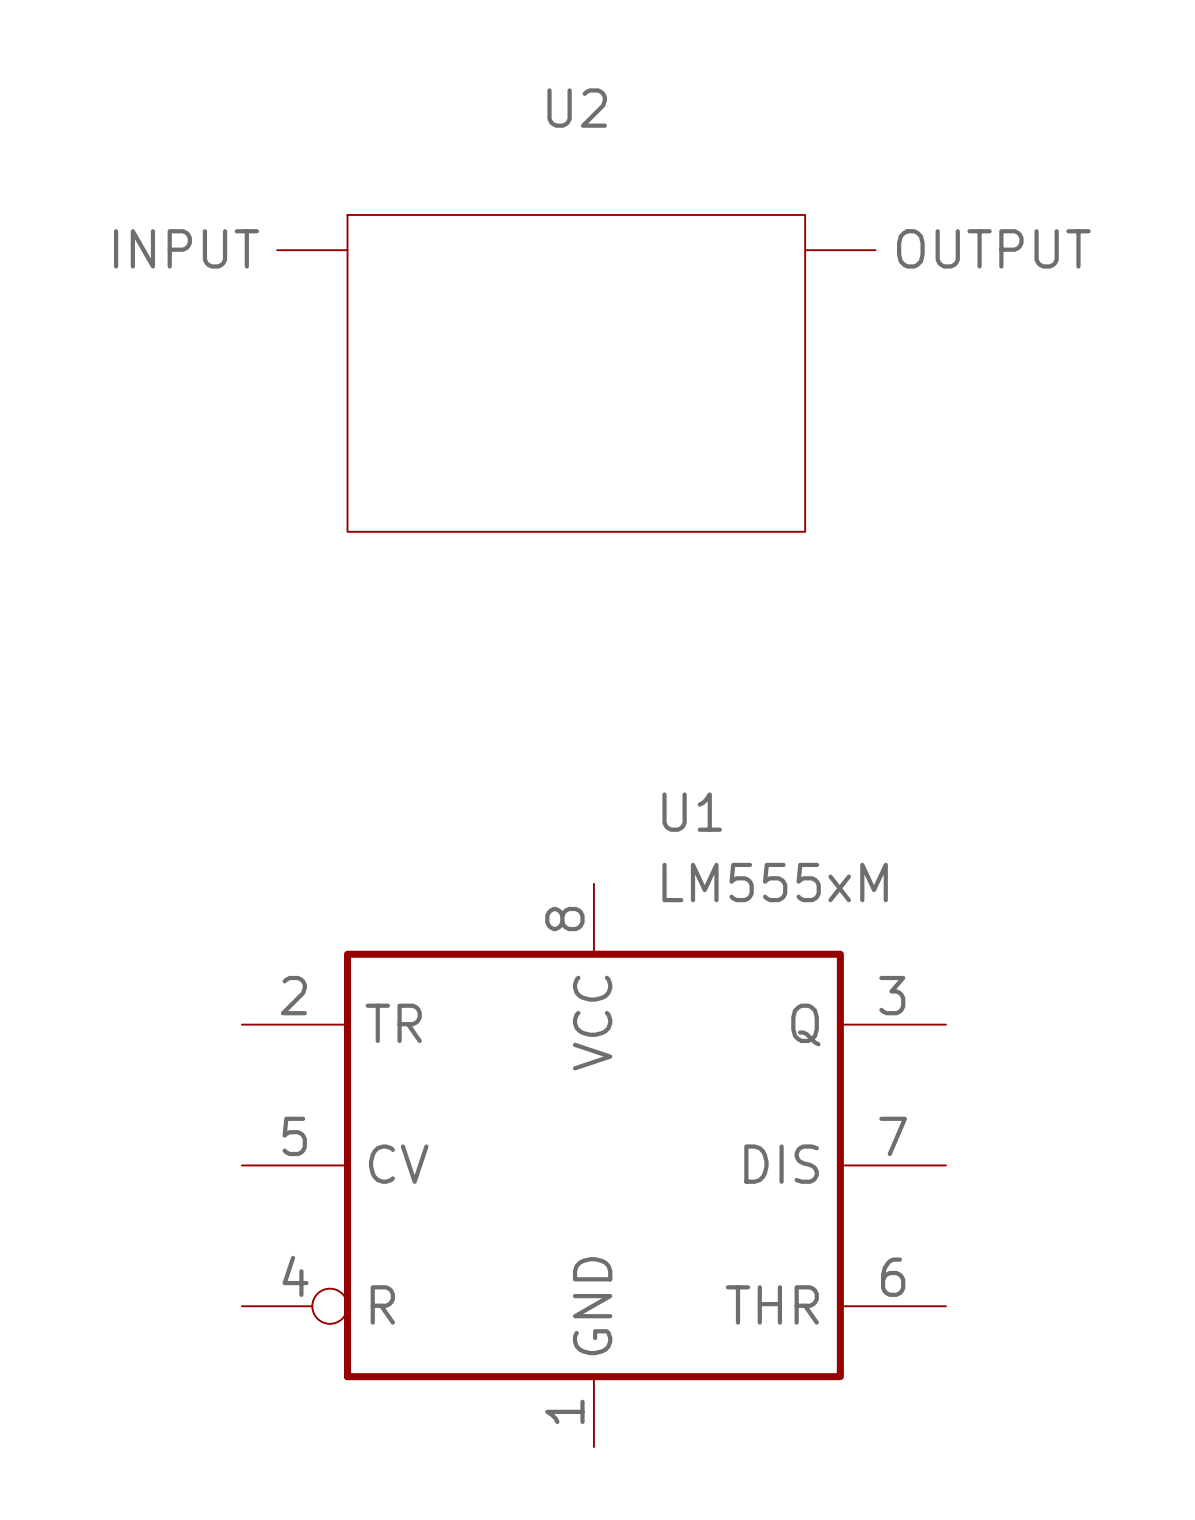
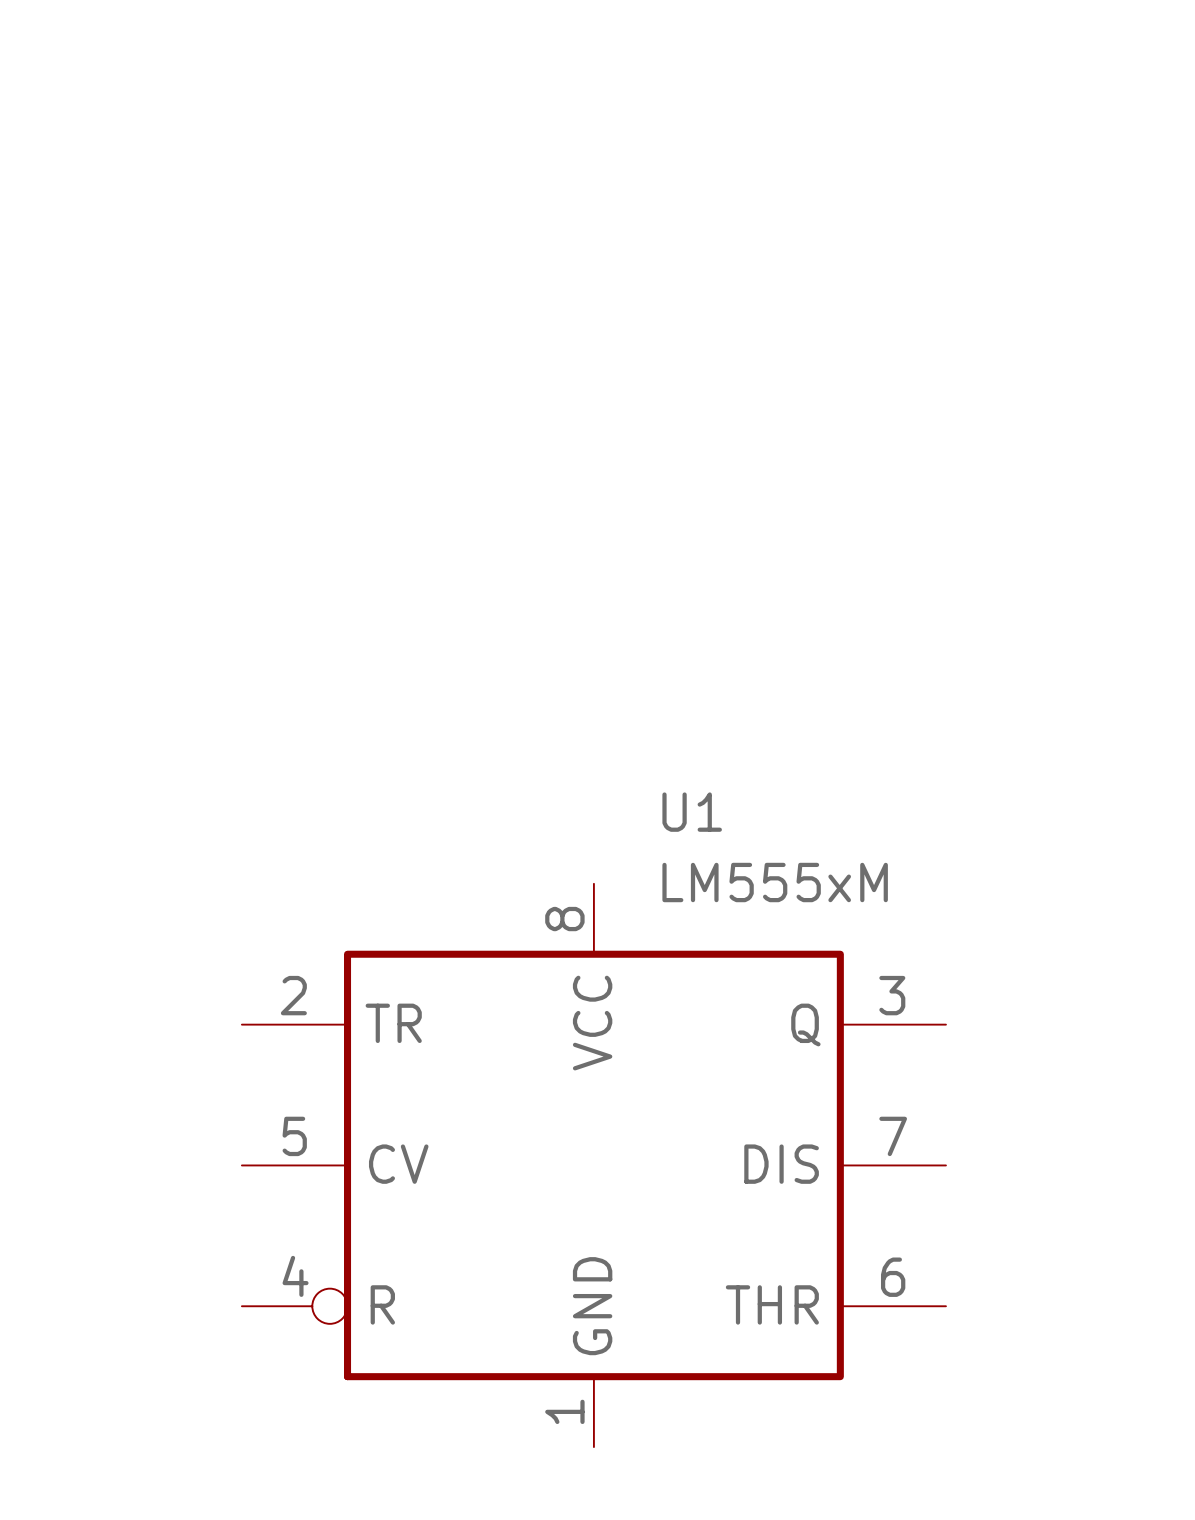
U2: (576, 373) -> none

